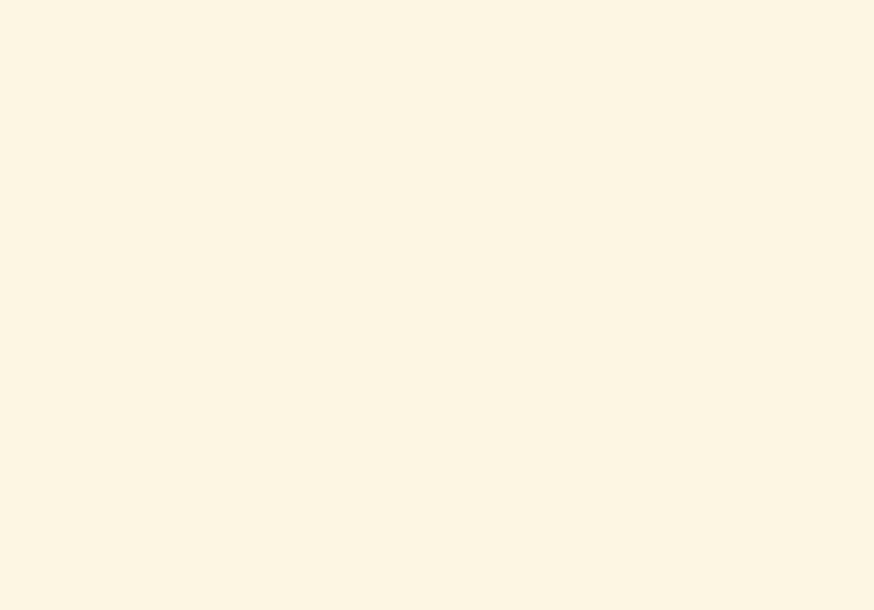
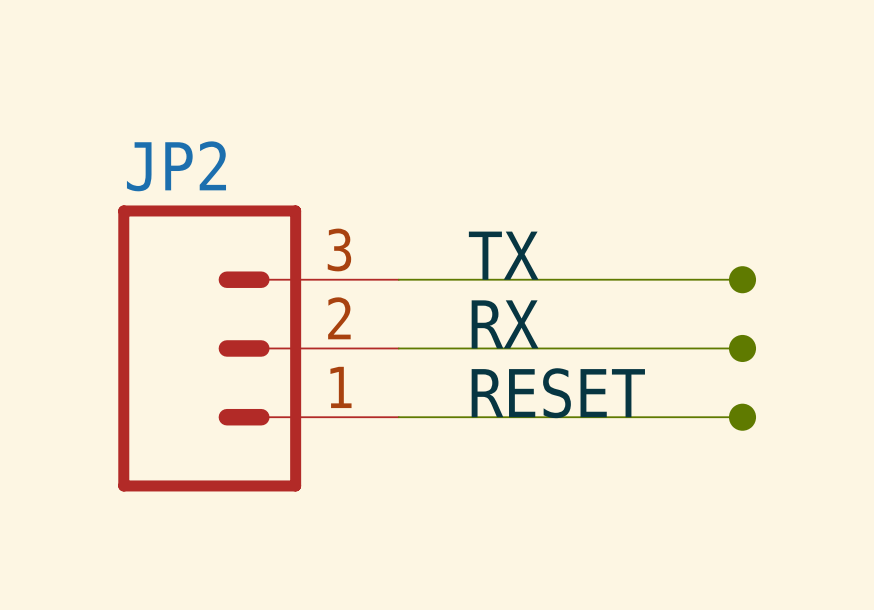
label: none -> TX (503, 255)
wire: none -> (398, 279) (742, 279)
junction: none -> (742, 279)
label: none -> RX (505, 324)
JP2: none -> (258, 348)
wire: none -> (398, 348) (742, 348)
junction: none -> (742, 348)
label: none -> RESET (558, 393)
wire: none -> (398, 417) (742, 417)
junction: none -> (742, 417)

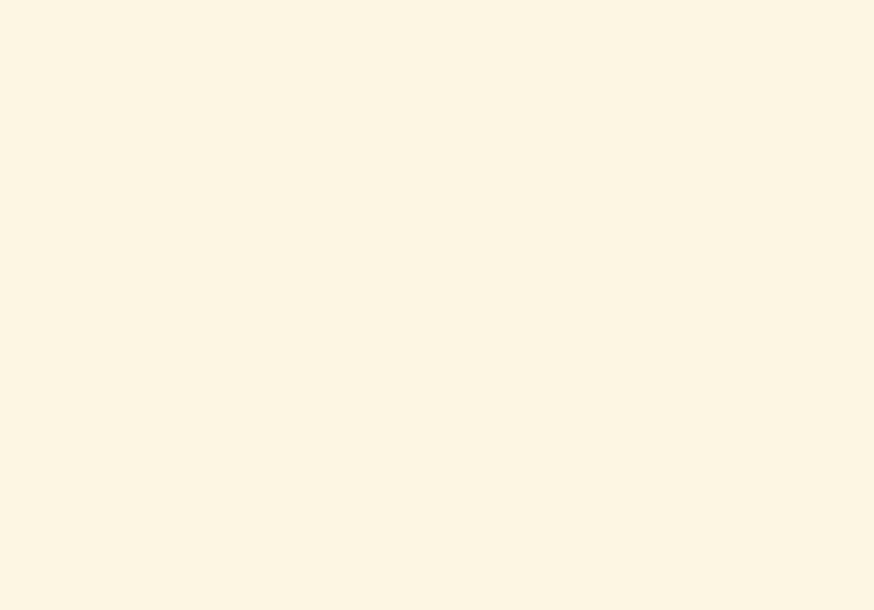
label: TX (503, 255) -> none
wire: (398, 279) (742, 279) -> none
junction: (742, 279) -> none
label: RX (505, 324) -> none
JP2: (258, 348) -> none
wire: (398, 348) (742, 348) -> none
junction: (742, 348) -> none
label: RESET (558, 393) -> none
wire: (398, 417) (742, 417) -> none
junction: (742, 417) -> none

